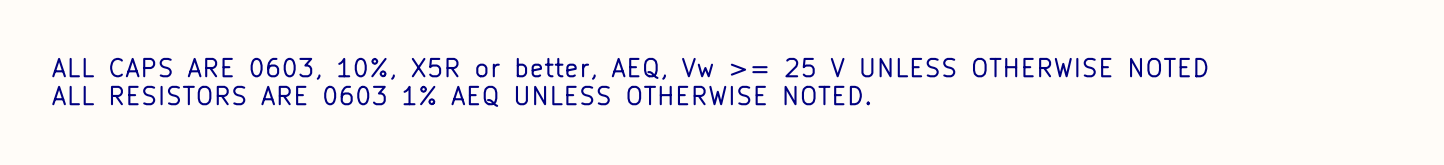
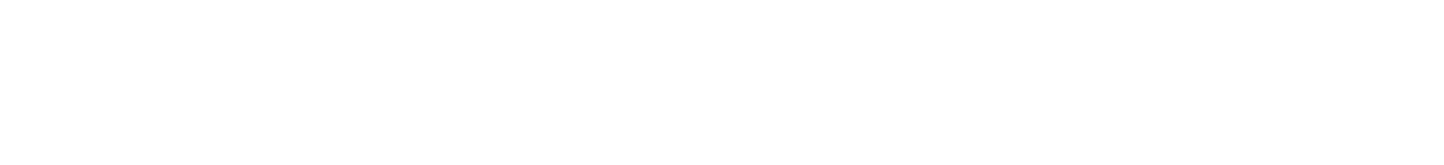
text: ALL CAPS ARE 0603, 10%, X5R or better, AEQ, Vw >= 25 V UNLESS OTHERWISE NOTED (629, 68) -> none
text: ALL RESISTORS ARE 0603 1% AEQ UNLESS OTHERWISE NOTED. (461, 96) -> none

